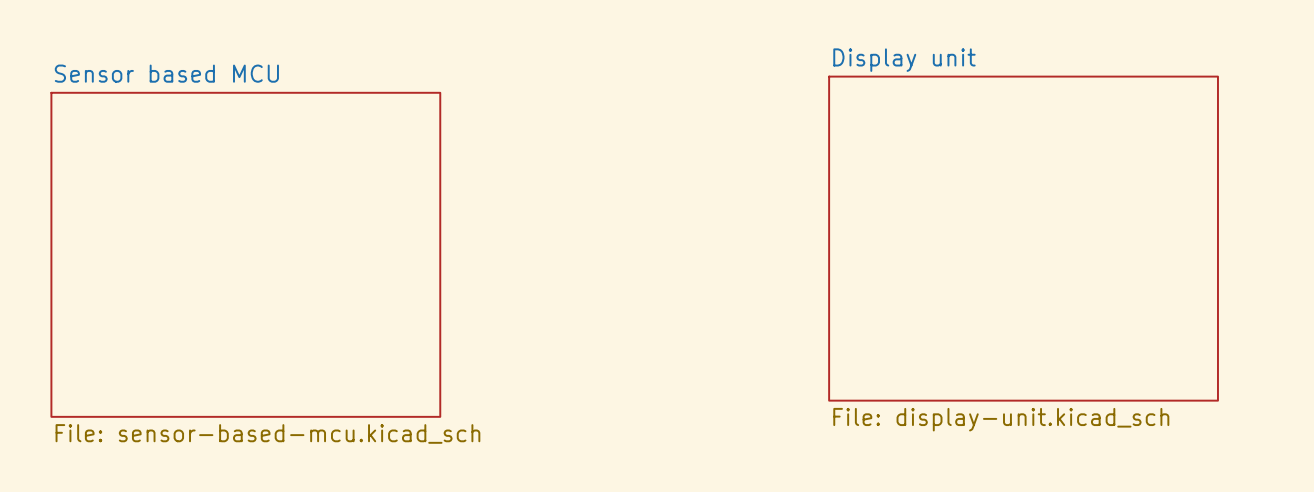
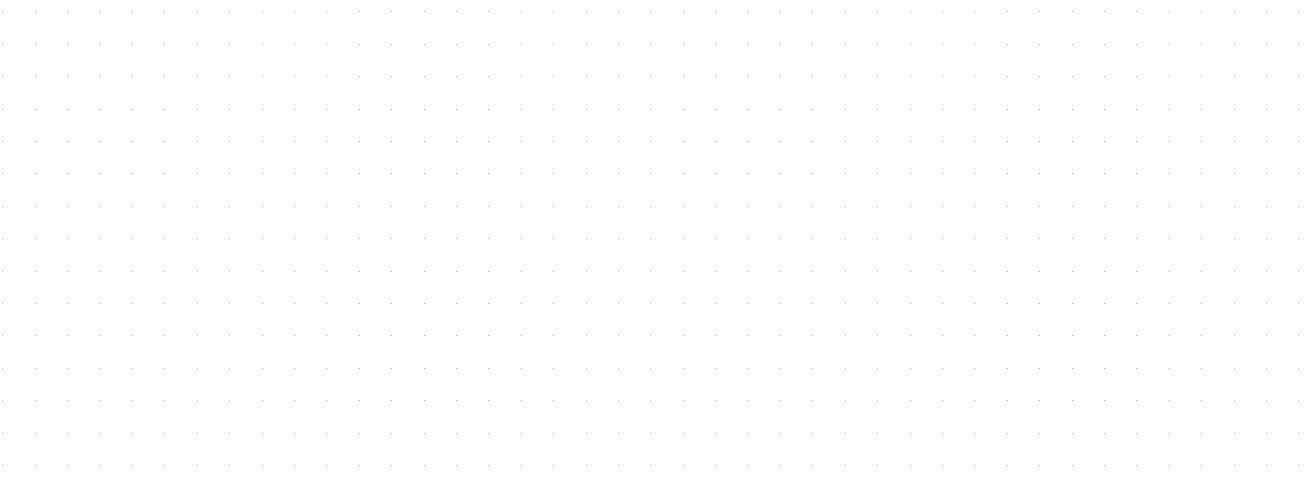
sheet Display unit: File: display-unit.kicad_sch (1023, 238) -> none
sheet Sensor based MCU: File: sensor-based-mcu.kicad_sch (245, 254) -> none

